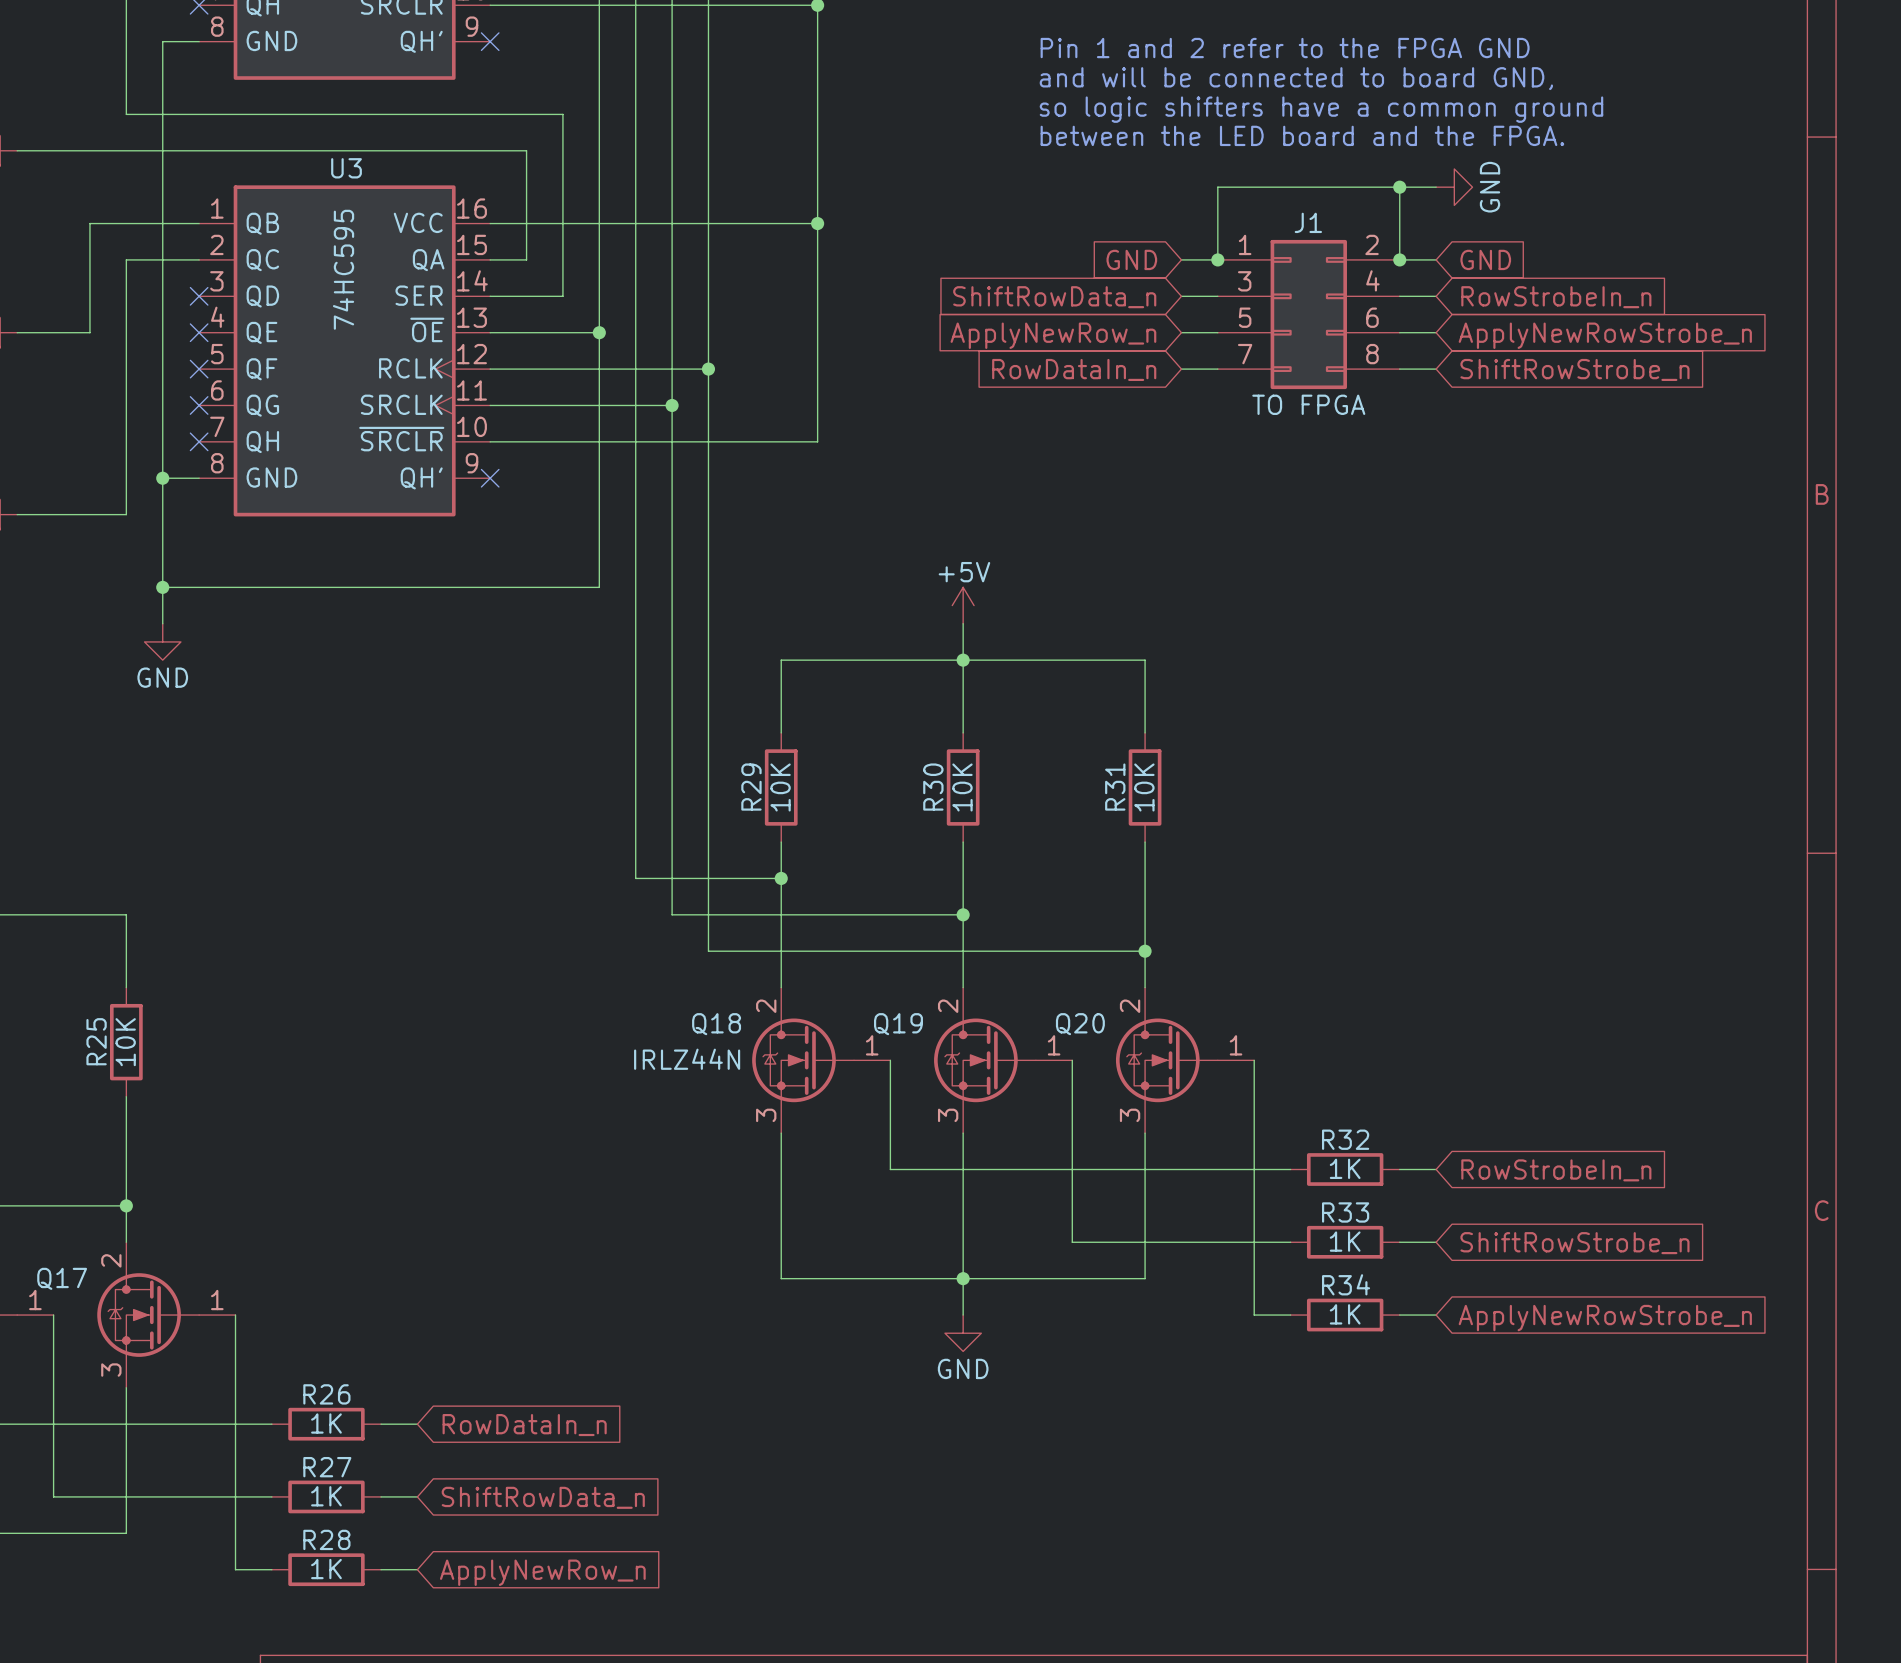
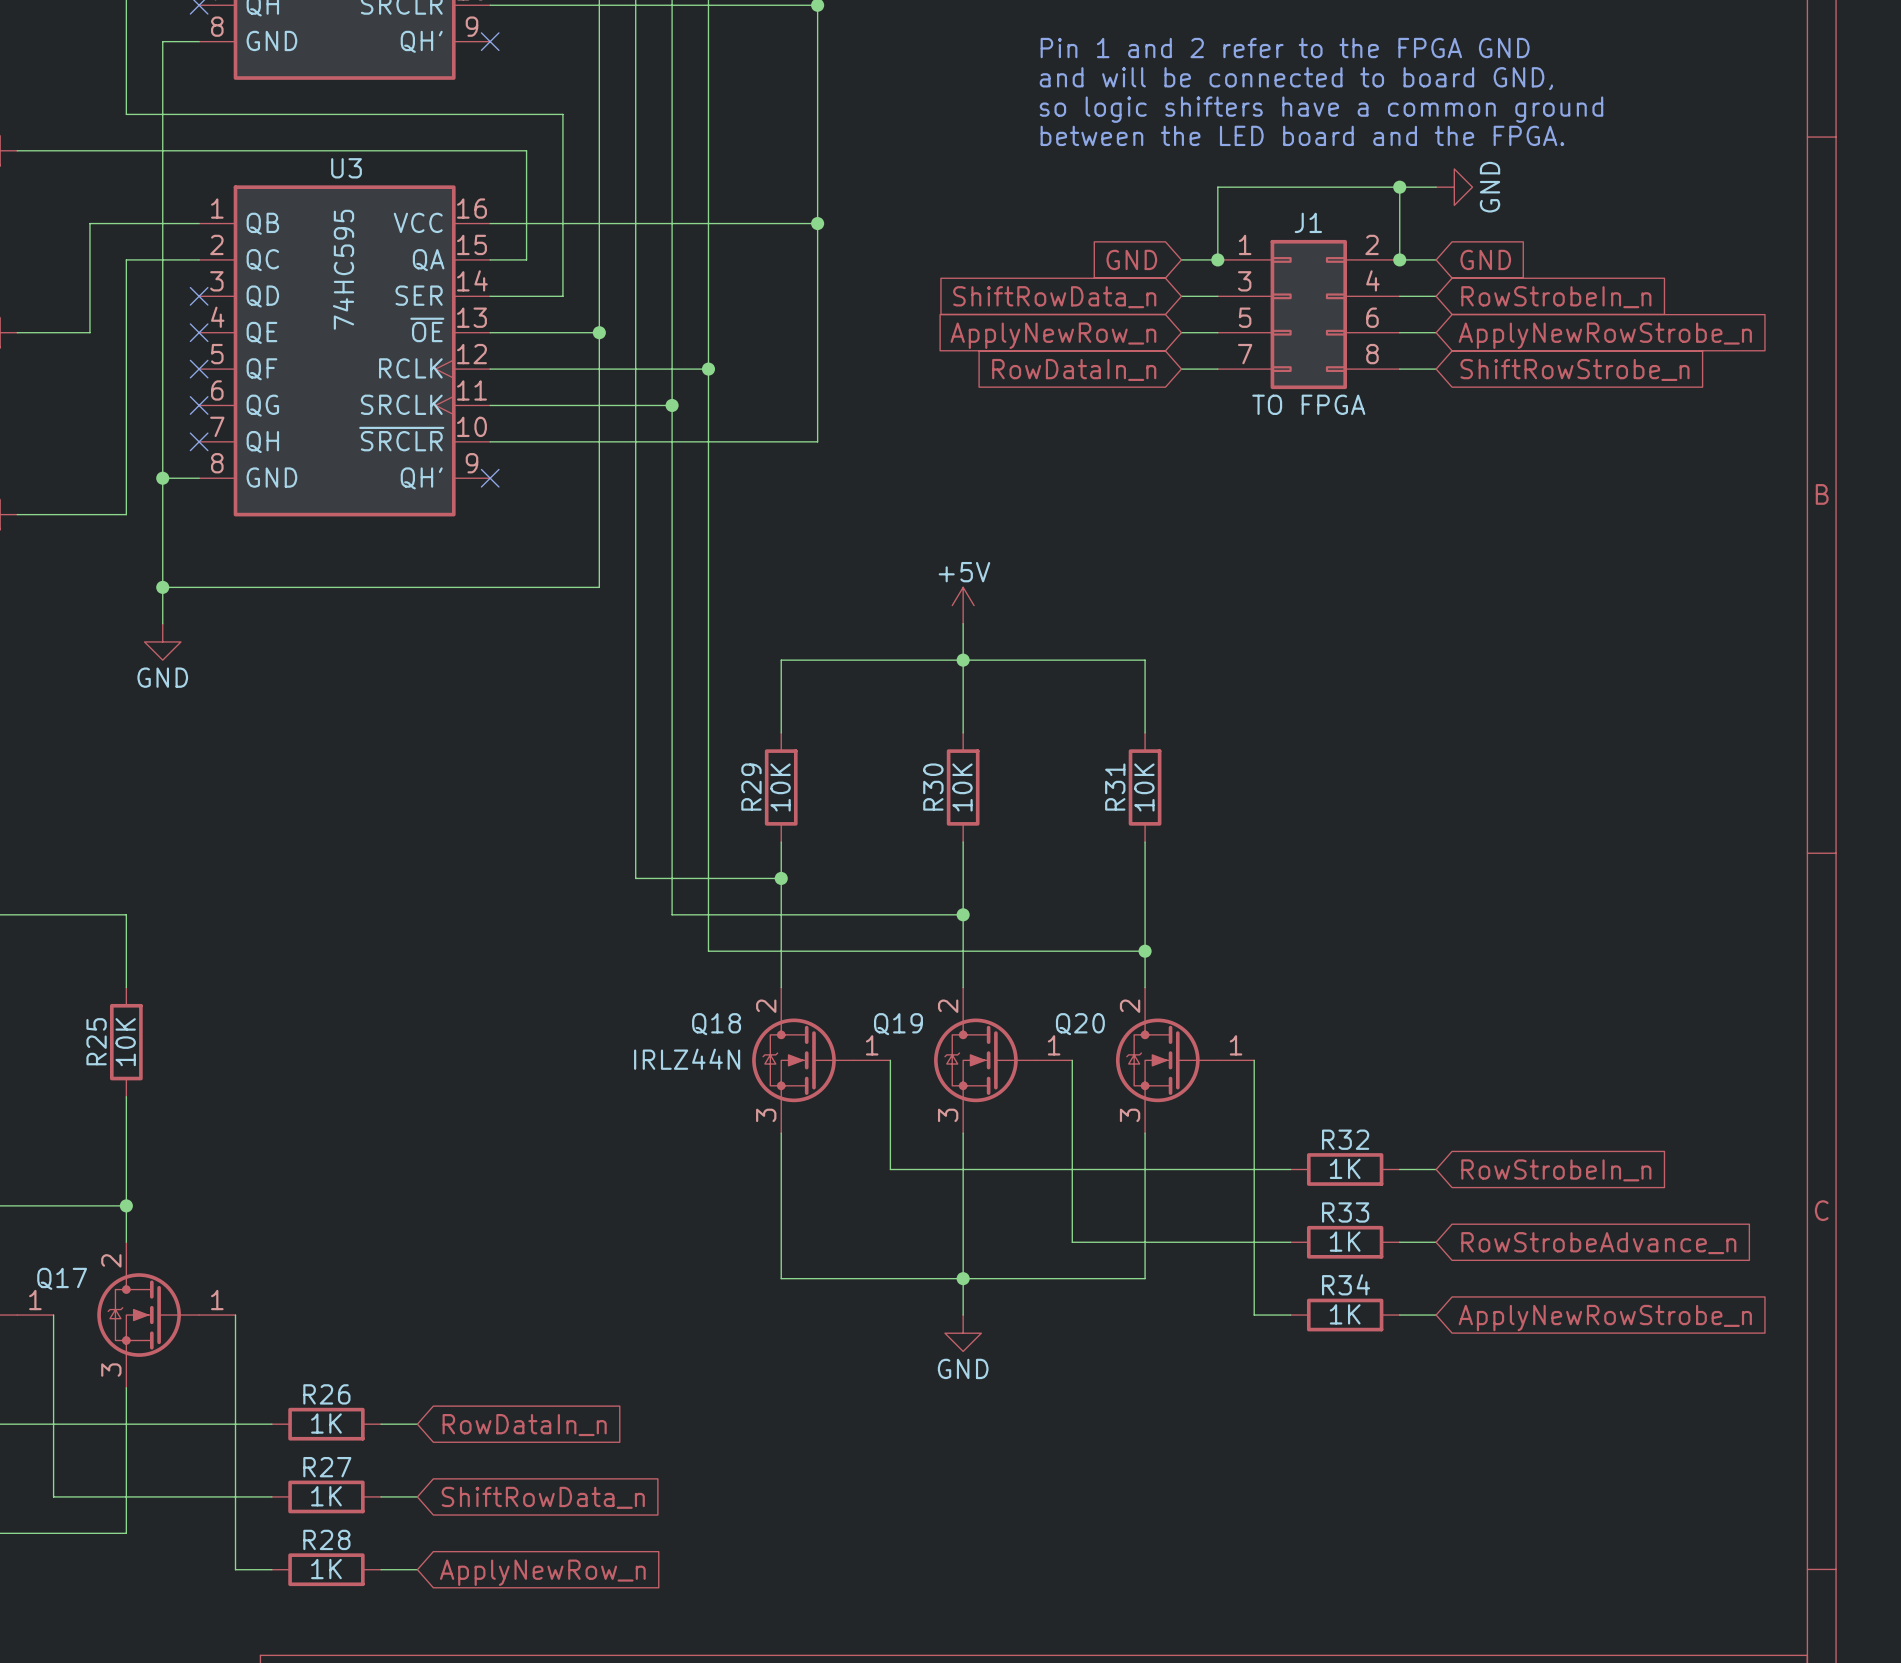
global label: ShiftRowStrobe_n (1574, 1243) -> RowStrobeAdvance_n (1598, 1243)

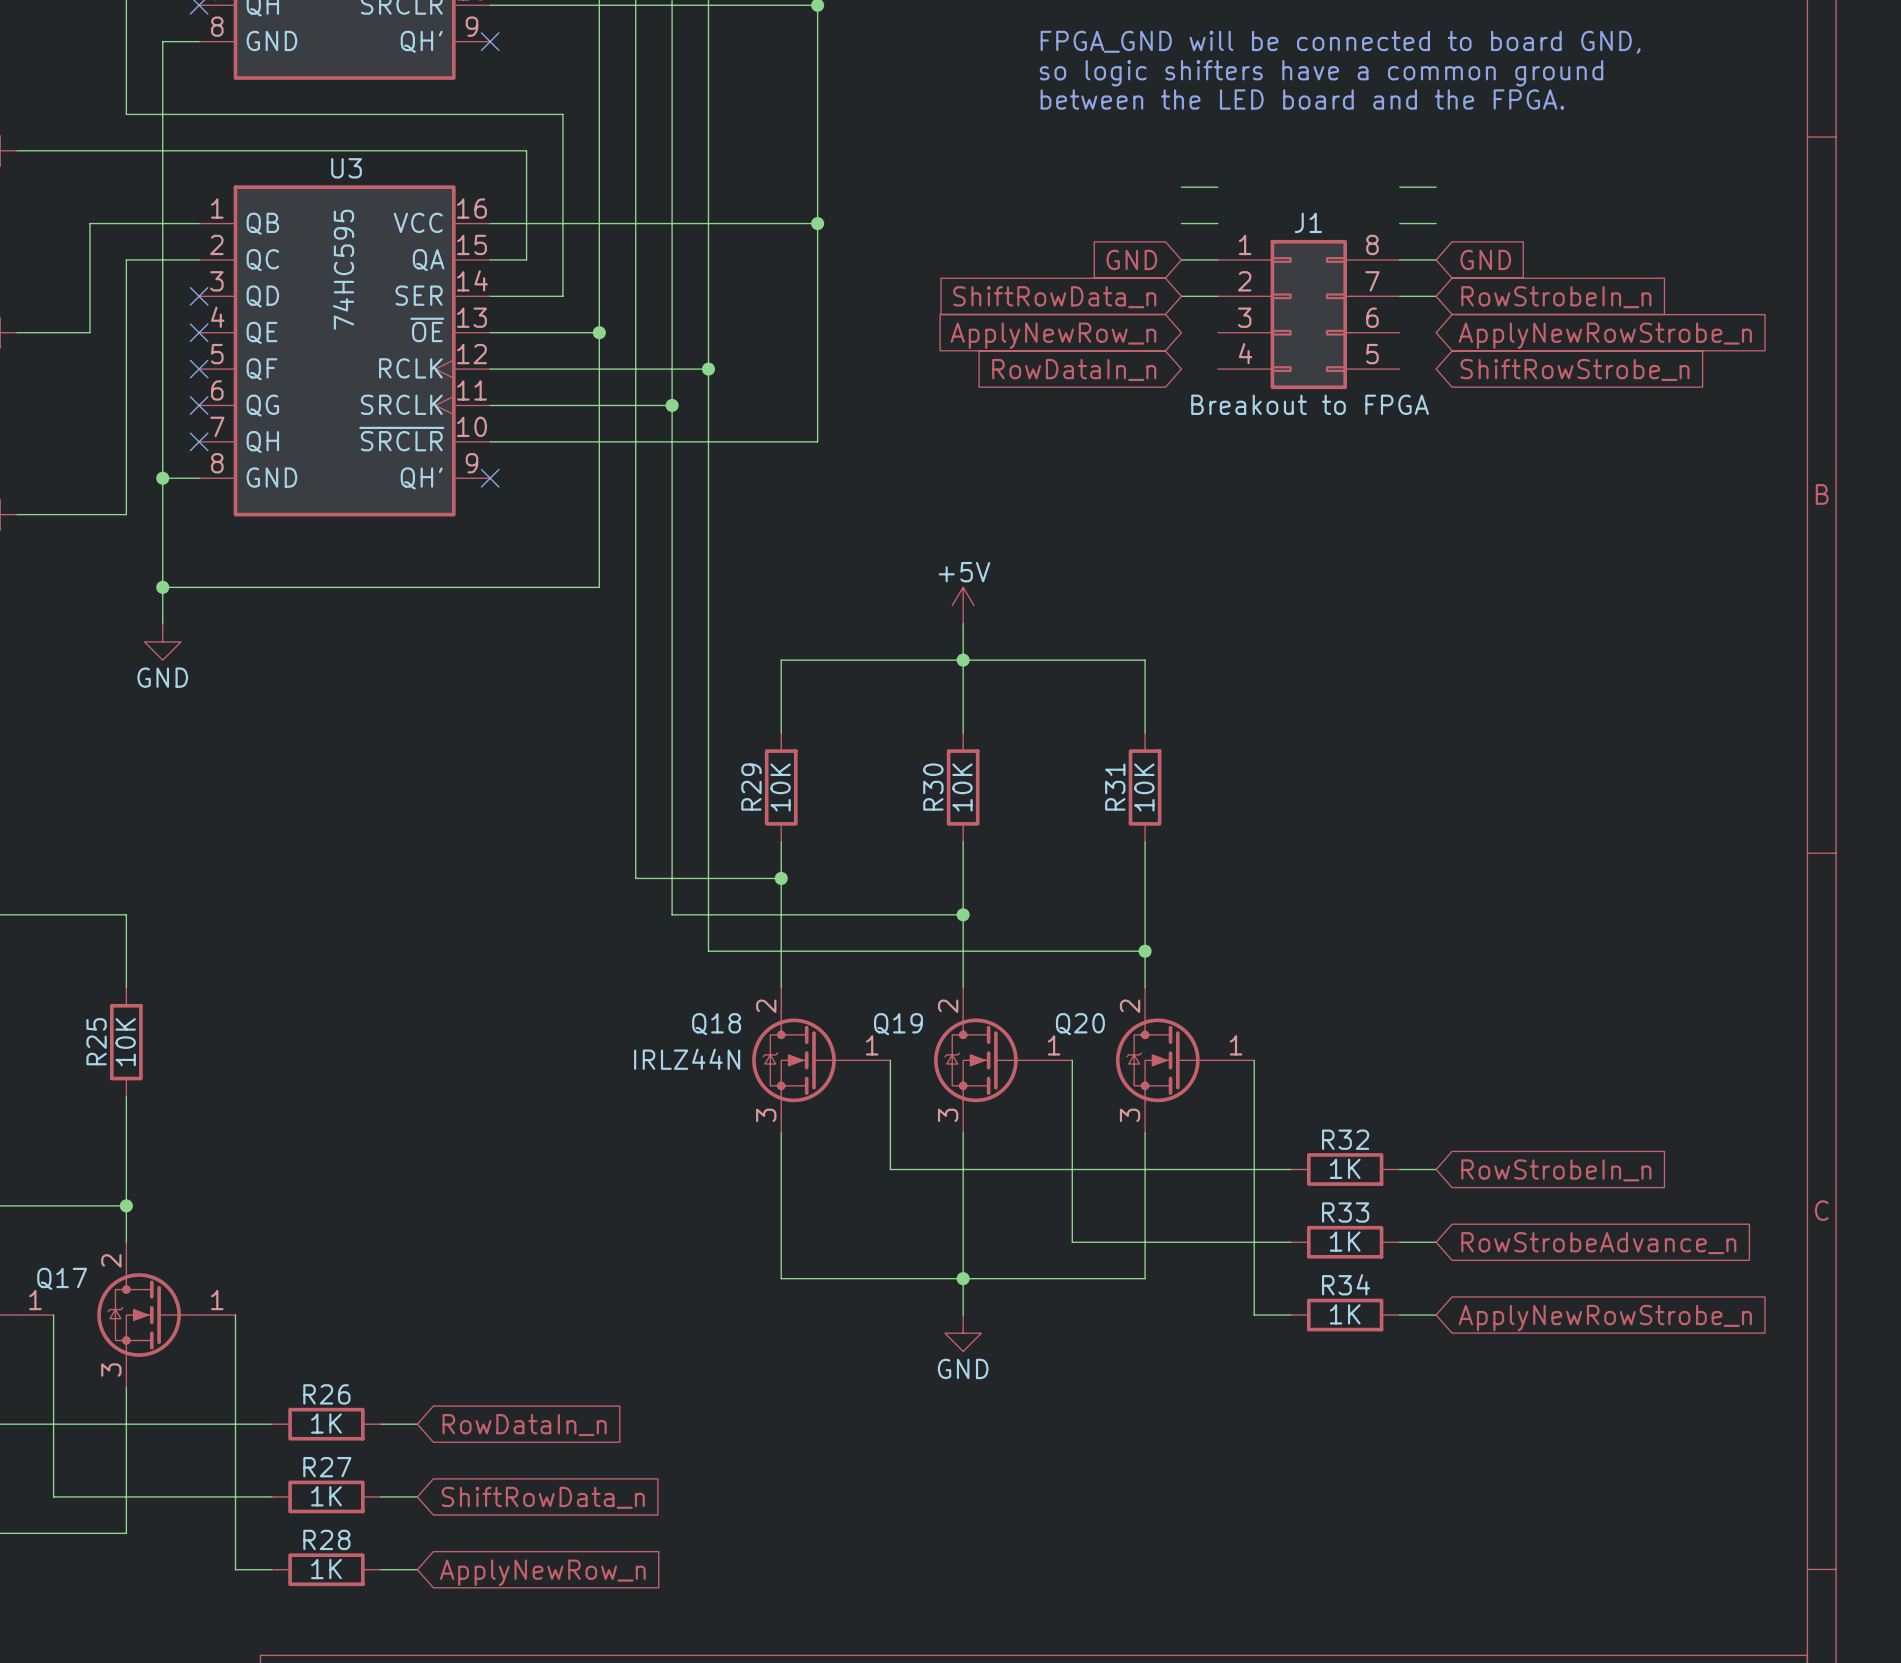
text: Pin 1 and 2 refer to the FPGA GND (1285, 48) -> FPGA_GND will be connected to board GND, (1340, 42)
text: and will be connected to board GND, (1296, 78) -> none
text position: so logic shifters have a common ground (1321, 109) -> so logic shifters have a common ground (1321, 73)
text position: between the LED board and the FPGA. (1302, 135) -> between the LED board and the FPGA. (1302, 99)
junction: (1399, 187) -> none
power symbol: GND (1454, 187) -> none
J1 pin number: 2 (1372, 244) -> 8 (1372, 244)
wire: (1217, 259) (1217, 187) (1399, 187) (1399, 259) -> none
junction: (1217, 259) -> none
junction: (1399, 259) -> none
J1 pin number: 4 (1372, 280) -> 7 (1372, 281)
J1 pin number: 3 (1244, 281) -> 2 (1244, 281)
J1 pin number: 5 (1245, 317) -> 3 (1244, 317)
wire: (1181, 332) (1217, 332) -> (1181, 187) (1217, 187)
wire: (1399, 332) (1436, 332) -> none
J1 pin number: 7 (1245, 354) -> 4 (1245, 353)
J1 pin number: 8 (1372, 354) -> 5 (1372, 354)
wire: (1181, 369) (1217, 369) -> (1181, 223) (1217, 223)
wire: (1399, 369) (1436, 369) -> (1399, 223) (1436, 223)
J1 value: TO FPGA (1308, 404) -> Breakout to FPGA (1310, 404)

